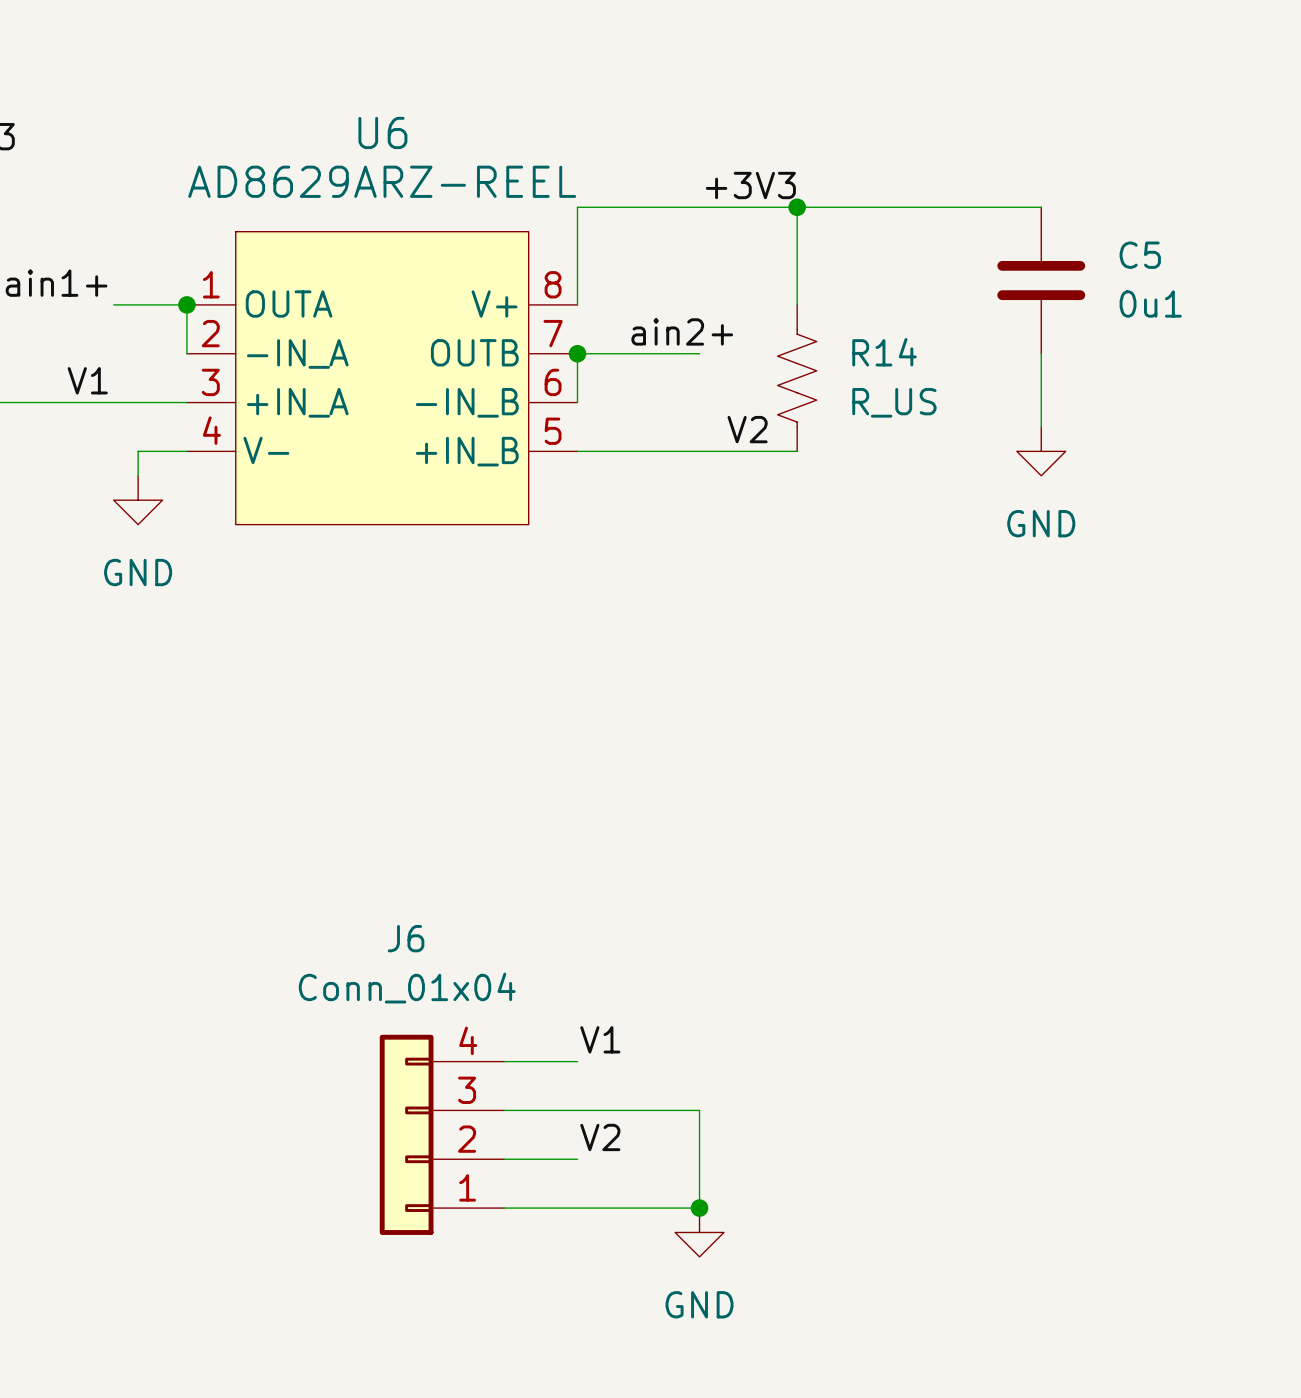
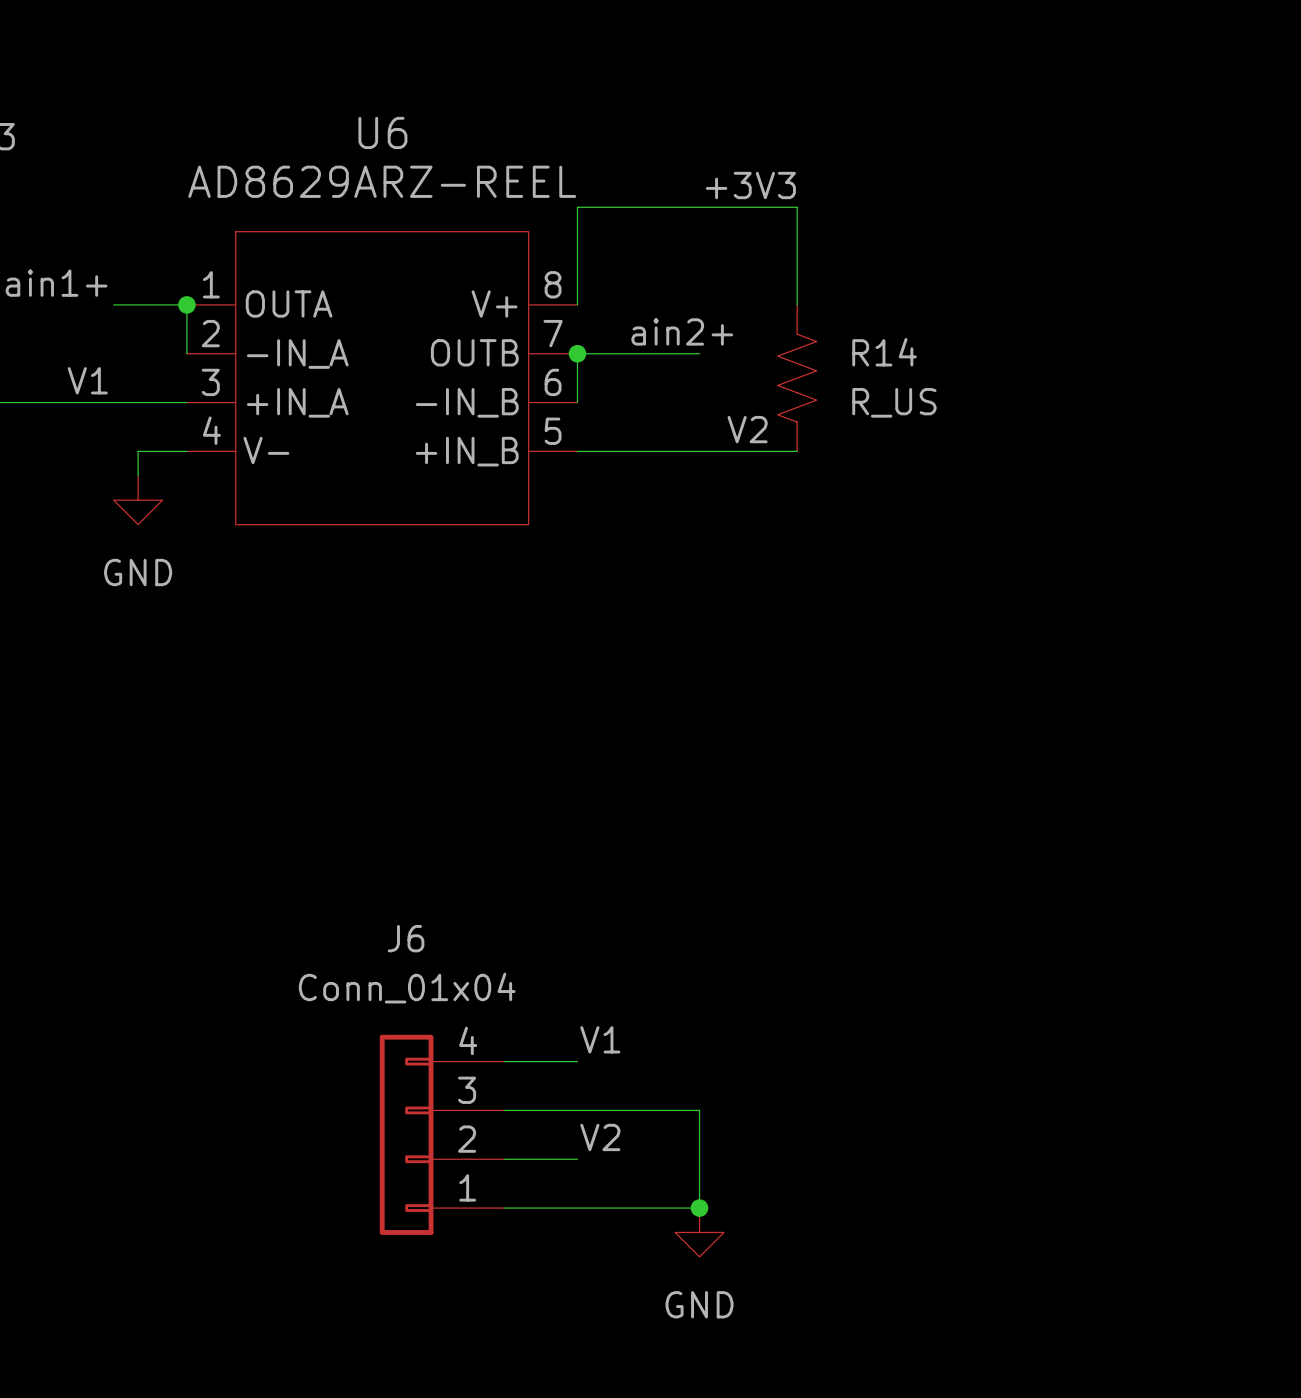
wire: (797, 207) (1041, 207) -> none
junction: (797, 207) -> none
C5: 0u1 (1041, 280) -> none
wire: (1041, 353) (1041, 426) -> none
power symbol: GND (1041, 451) -> none

